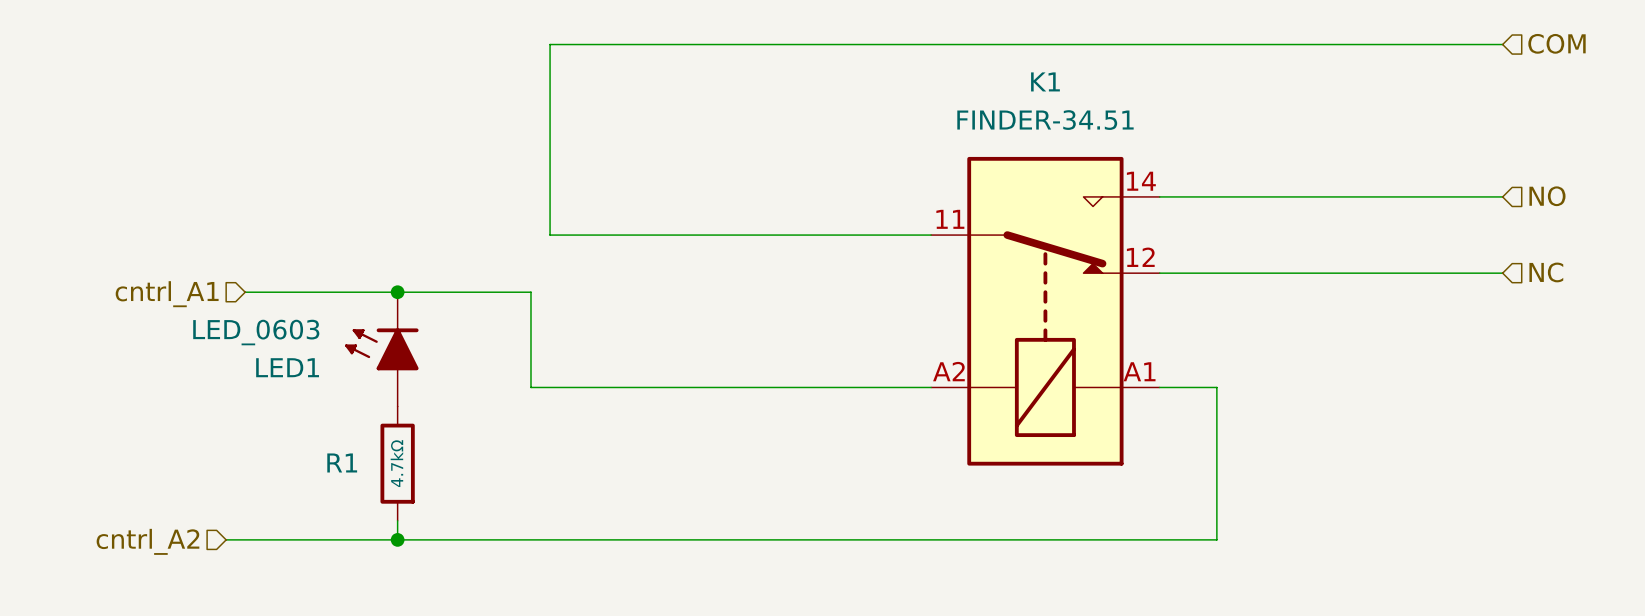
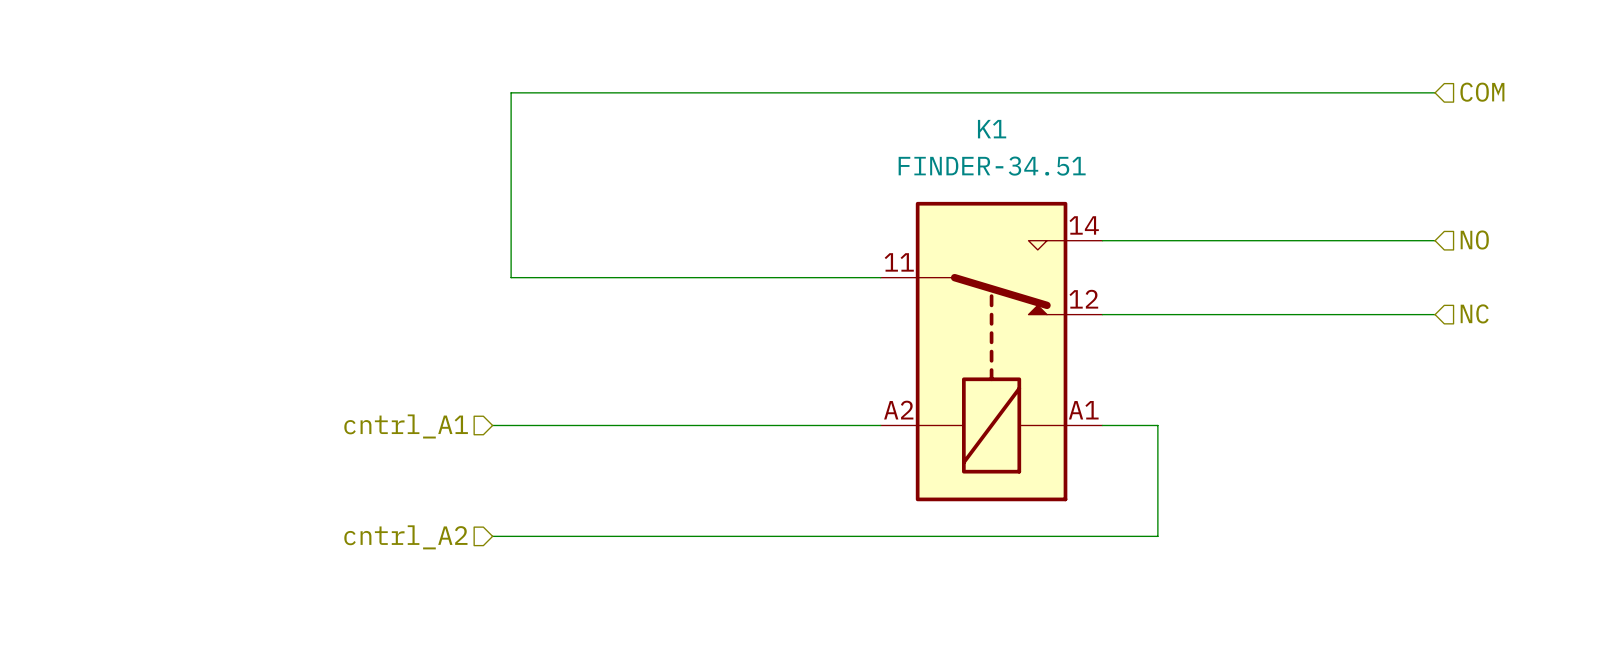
wire: (245, 292) (530, 292) (530, 387) -> none
junction: (397, 292) -> none
hierarchical label position: cntrl_A1 (167, 294) -> cntrl_A1 (406, 426)
LED1: LED_0603 (381, 349) -> none
R1: 4.7kΩ (397, 463) -> none
wire: (1216, 501) (1216, 539) (226, 539) -> (1157, 536) (492, 536)
wire: (397, 520) (397, 539) -> none
junction: (397, 539) -> none
hierarchical label position: cntrl_A2 (147, 541) -> cntrl_A2 (405, 537)

